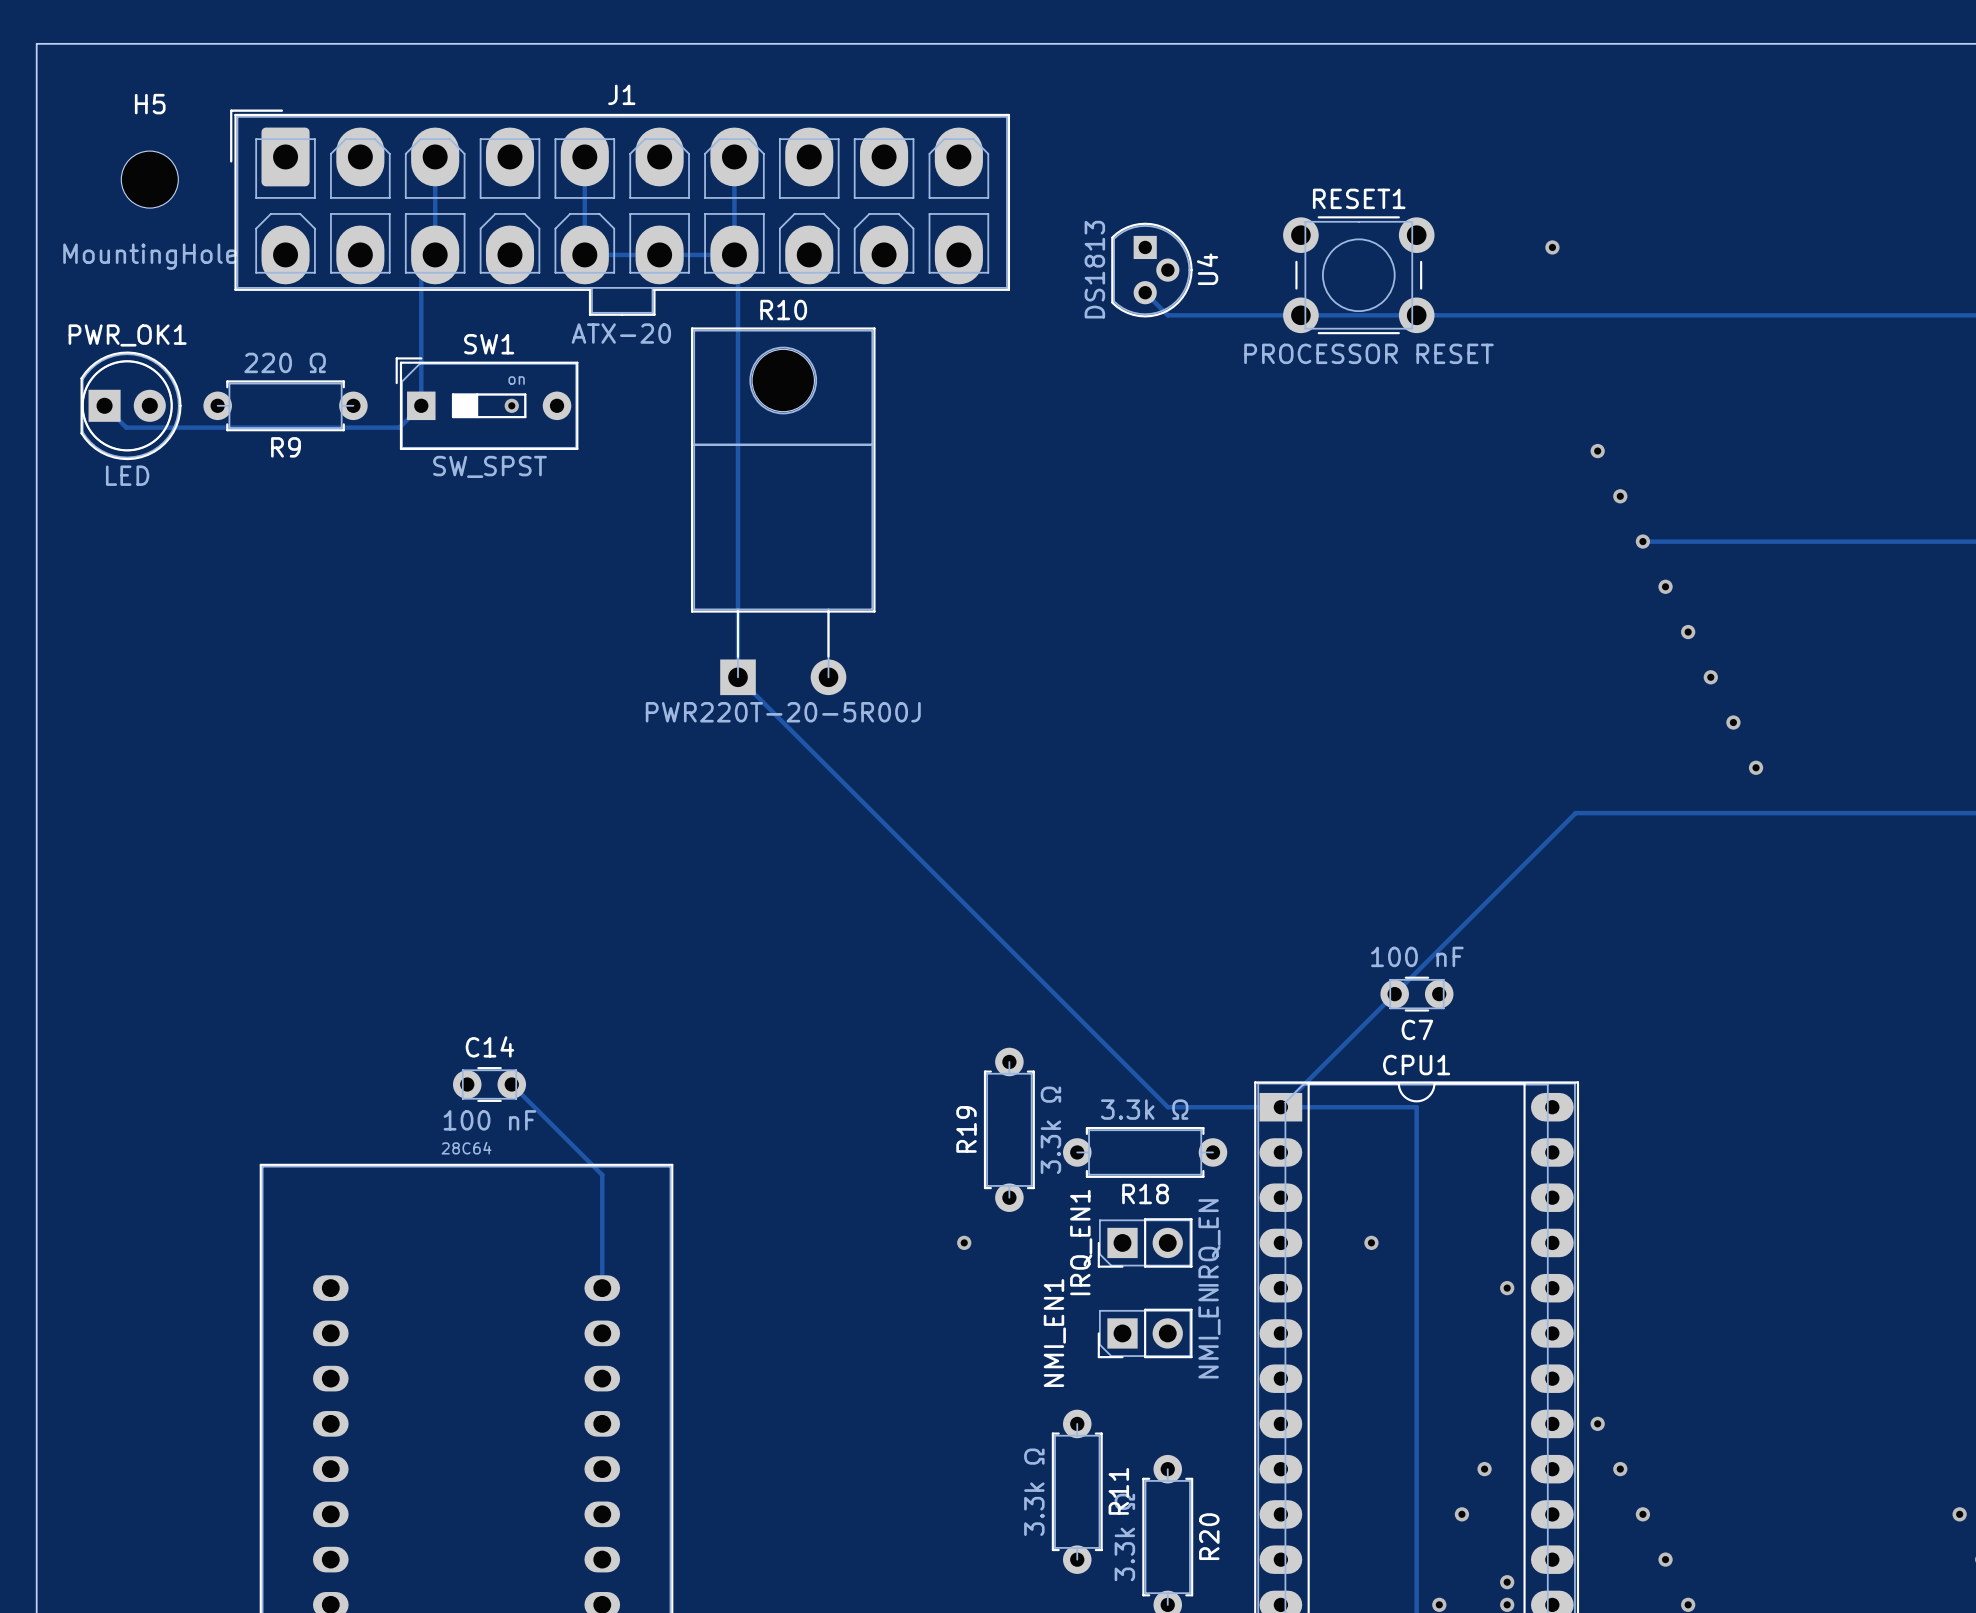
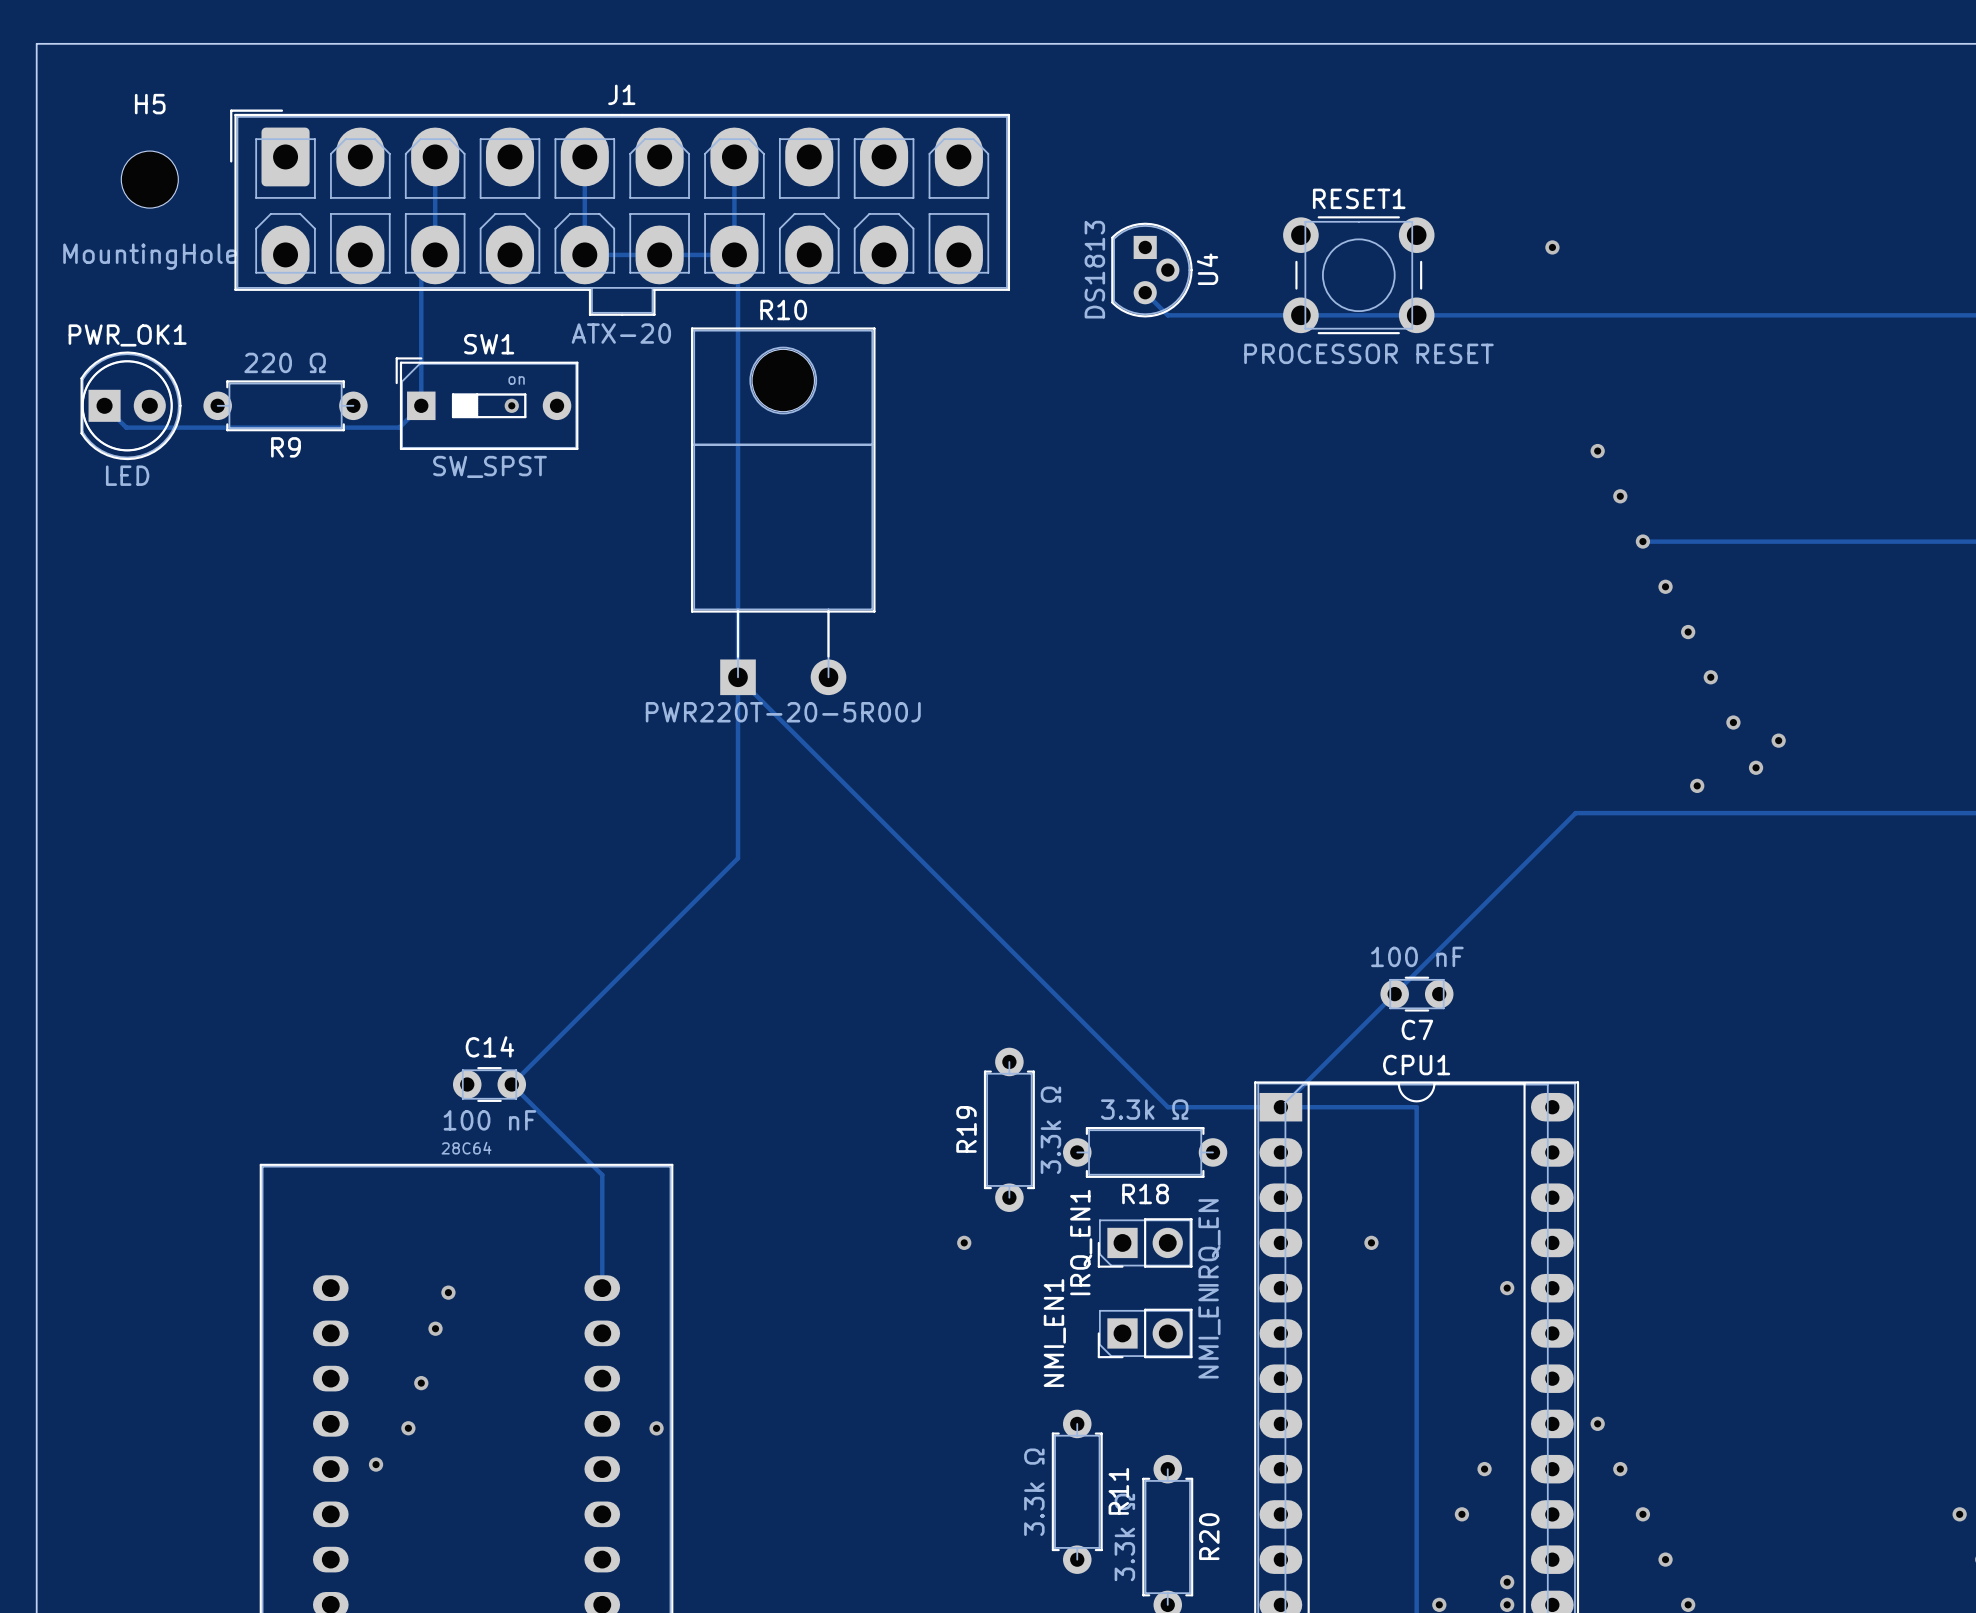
track: none -> (738, 677) (738, 858) (511, 1084)
via: none -> (1778, 740)
via: none -> (1697, 785)
via: none -> (448, 1292)
via: none -> (435, 1328)
via: none -> (421, 1383)
via: none -> (408, 1428)
via: none -> (656, 1428)
via: none -> (376, 1464)

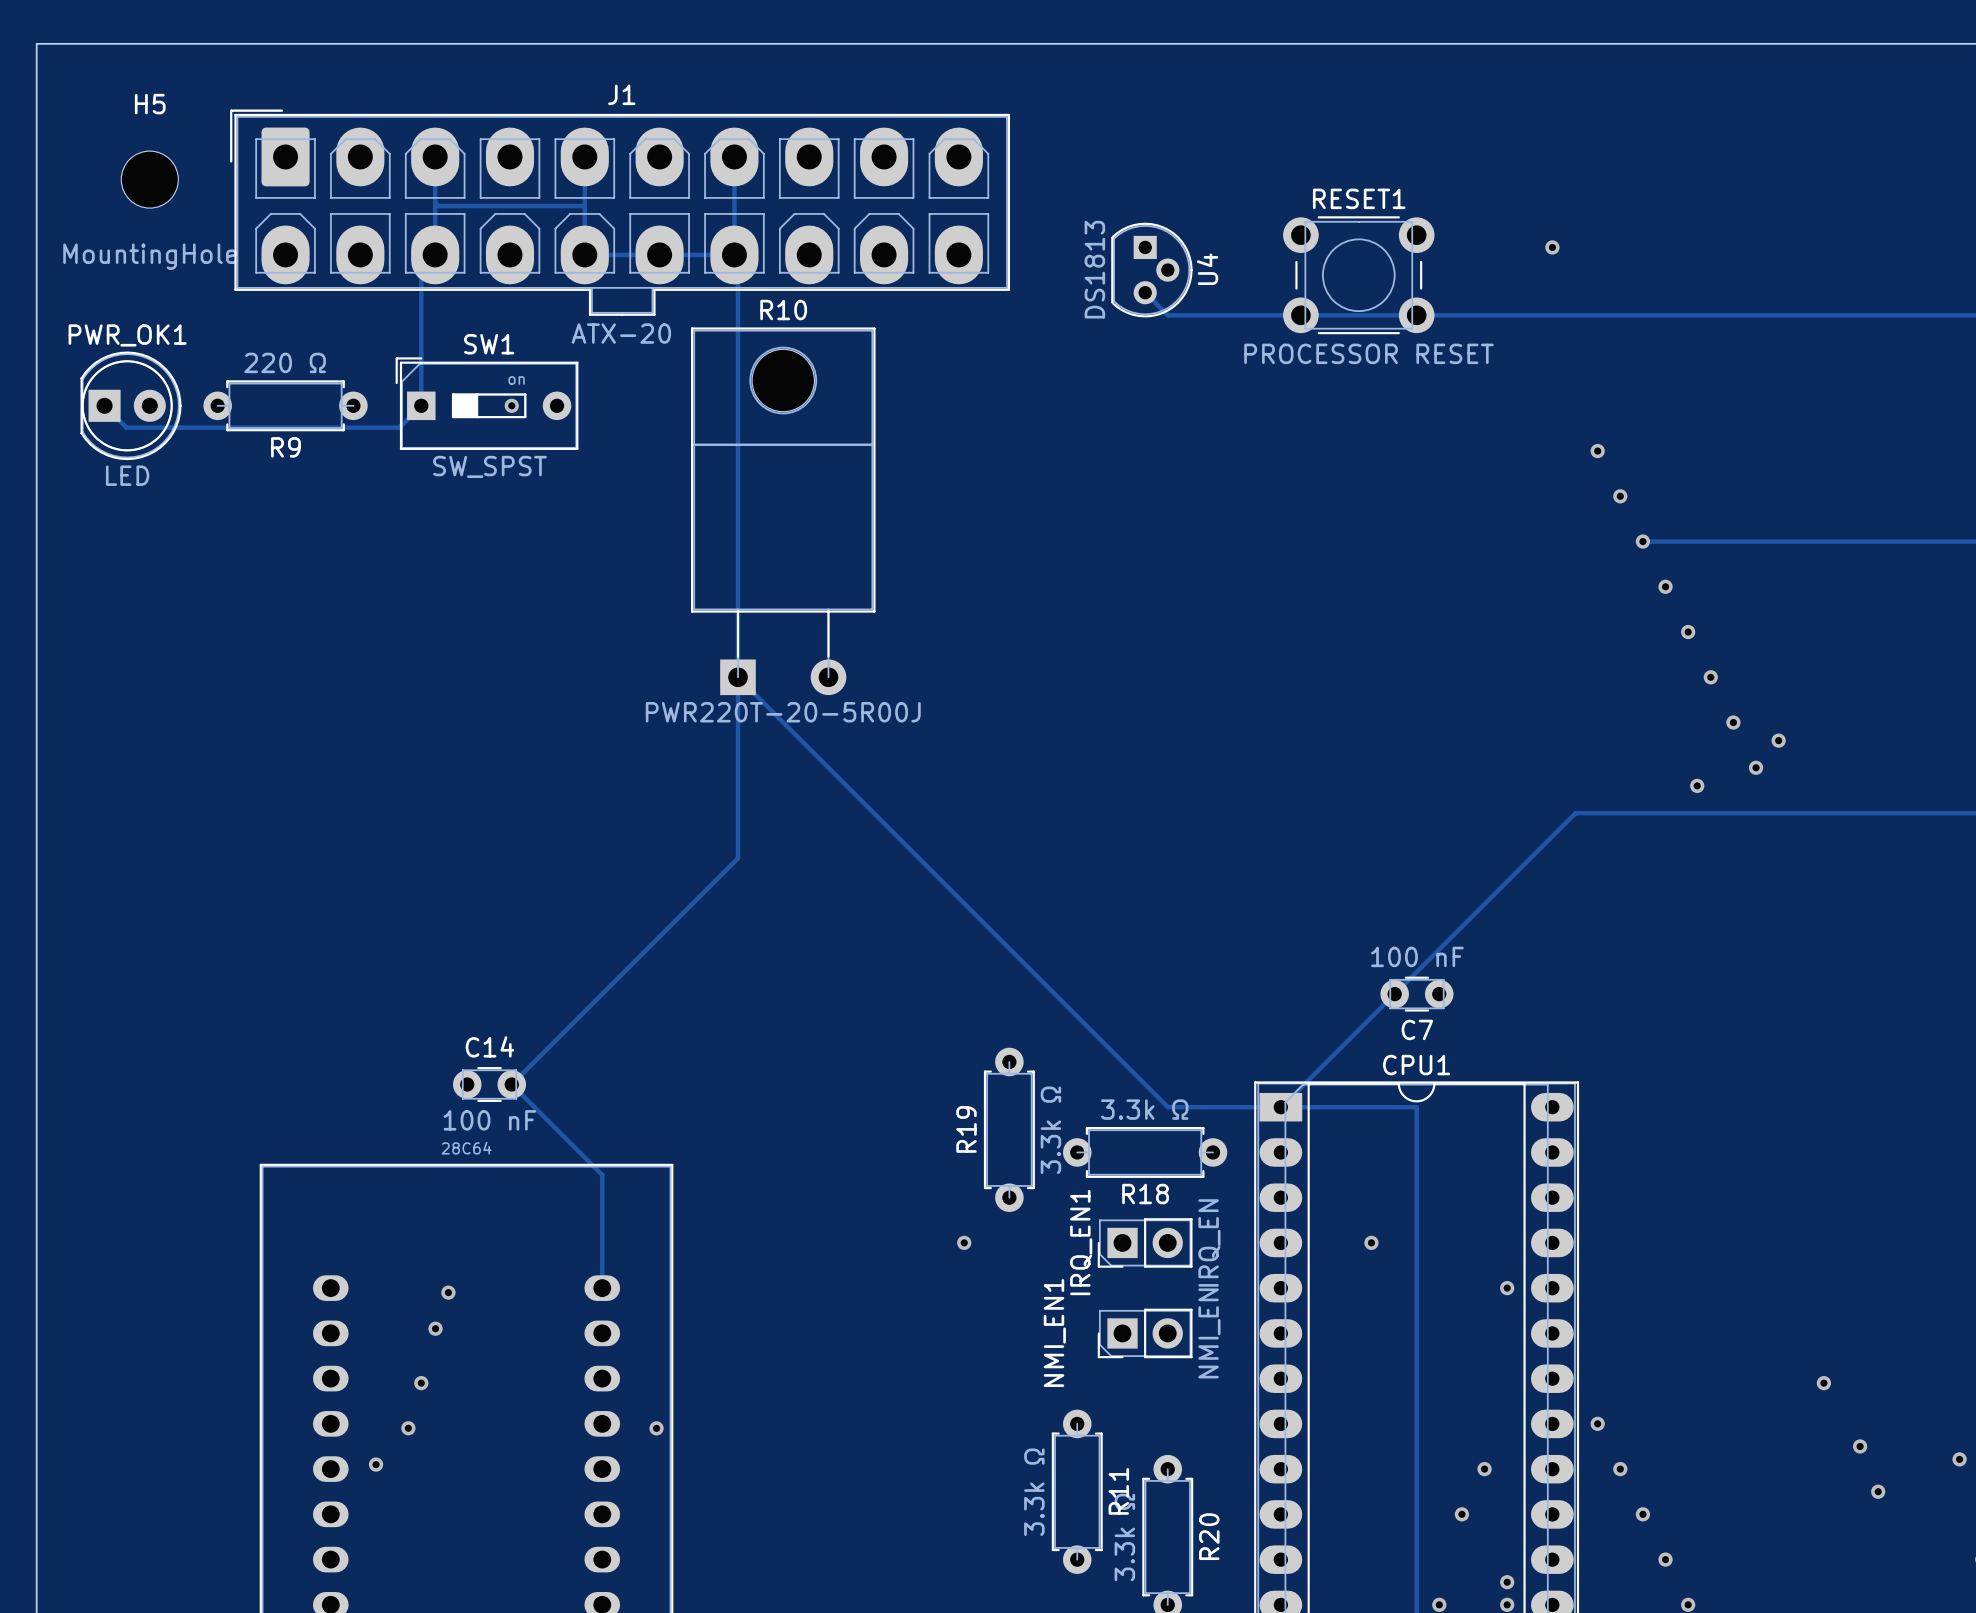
track: none -> (435, 202) (438, 206) (584, 206)
via: none -> (1823, 1383)
via: none -> (1860, 1446)
via: none -> (1959, 1459)
via: none -> (1878, 1491)
via: (1959, 1514) -> none

